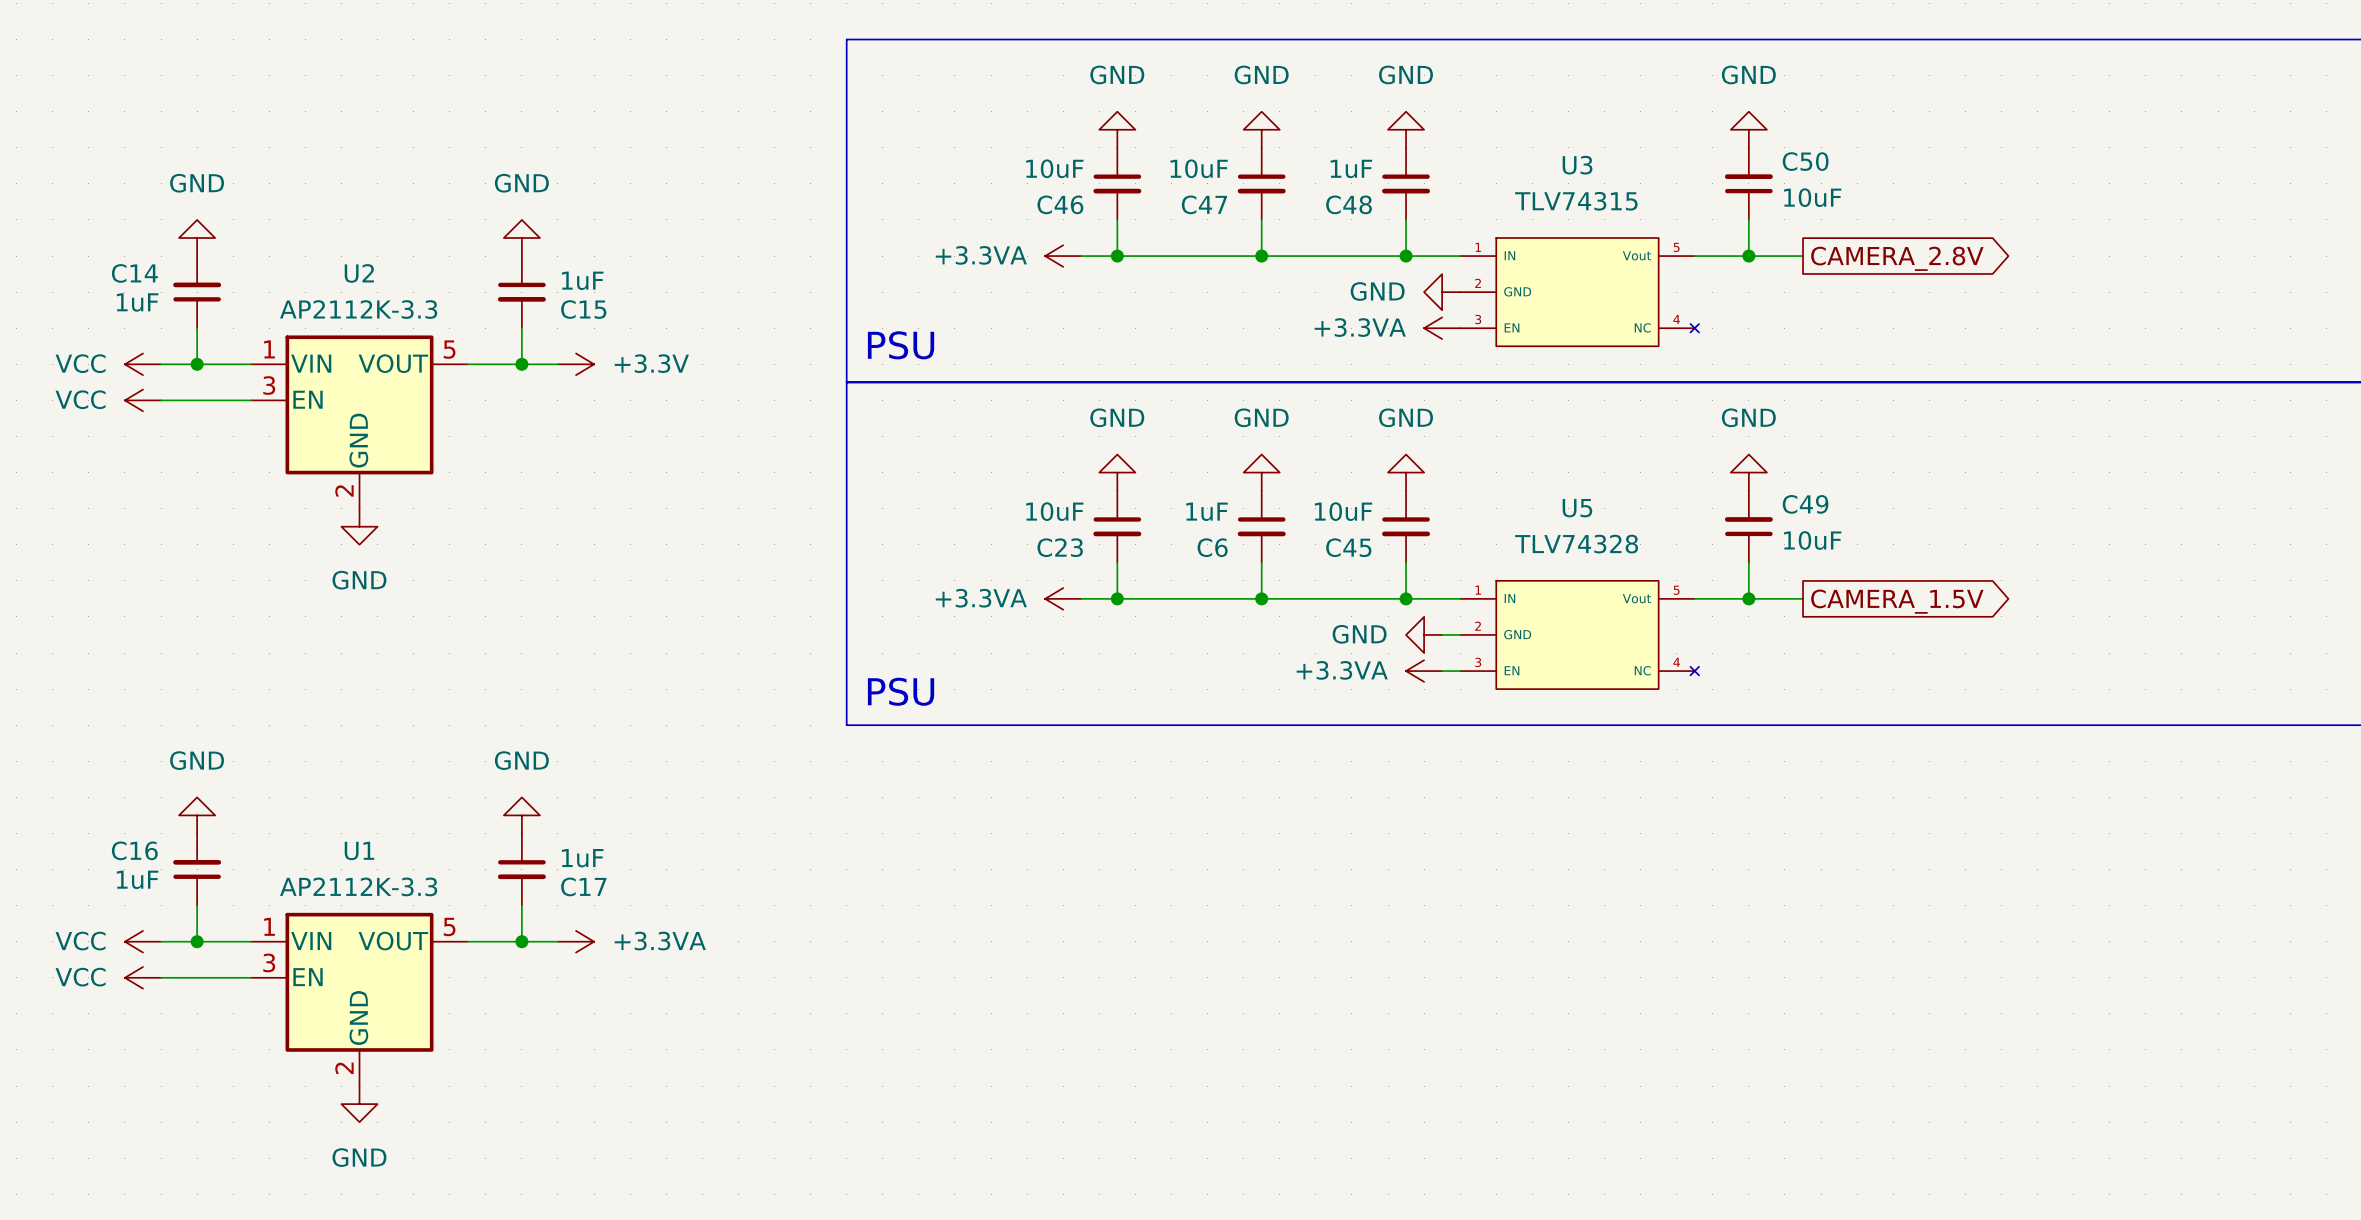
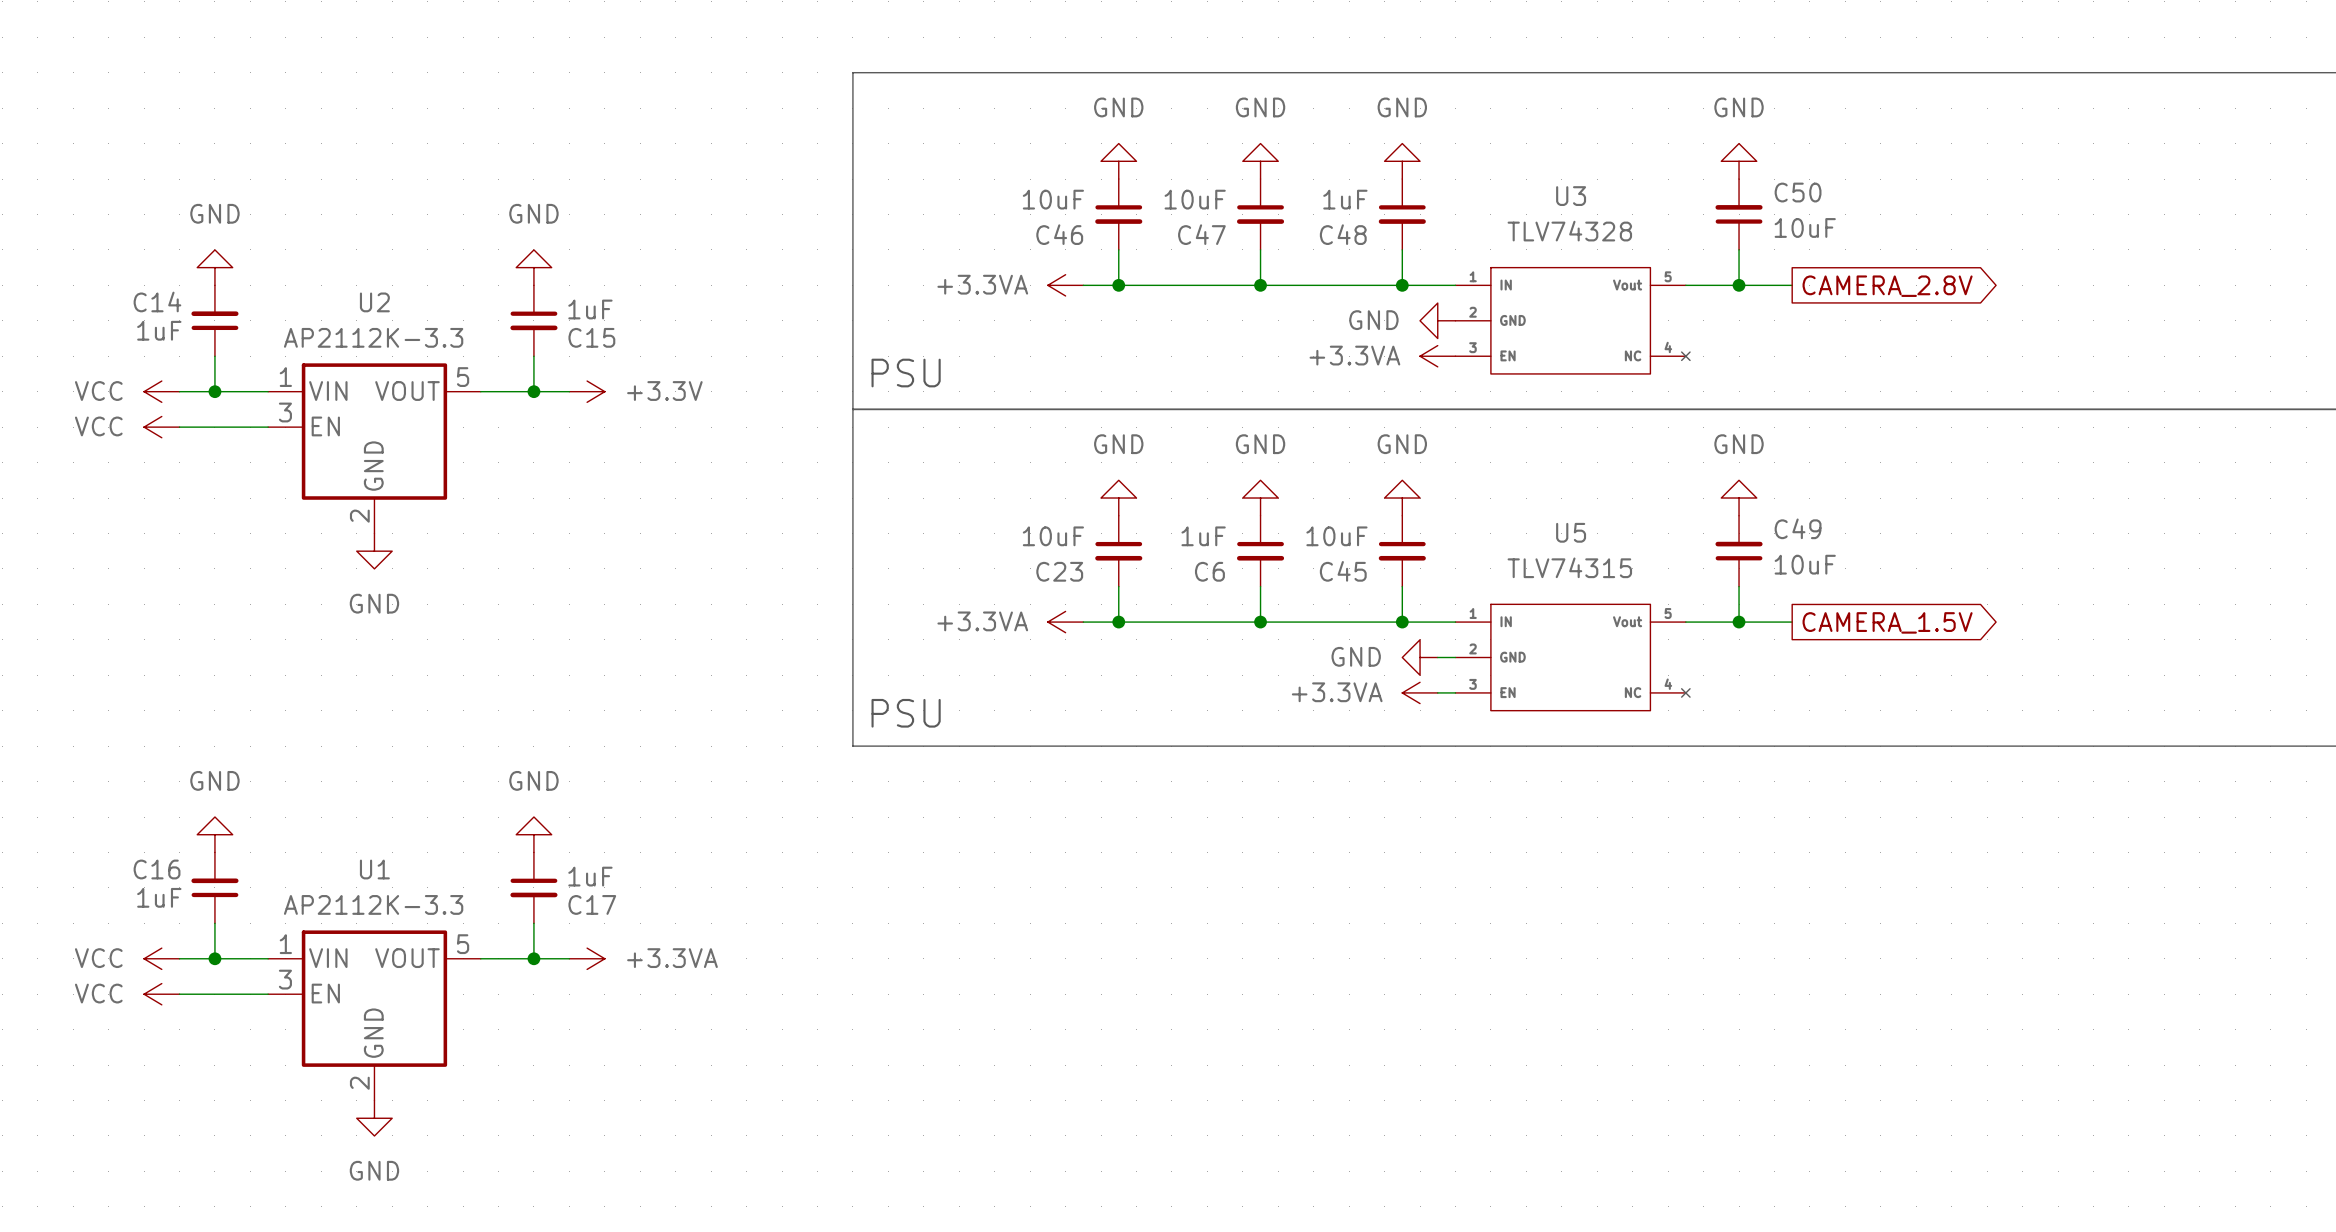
U3 value: TLV74315 (1576, 201) -> TLV74328 (1569, 231)
U5 value: TLV74328 (1576, 544) -> TLV74315 (1569, 567)

